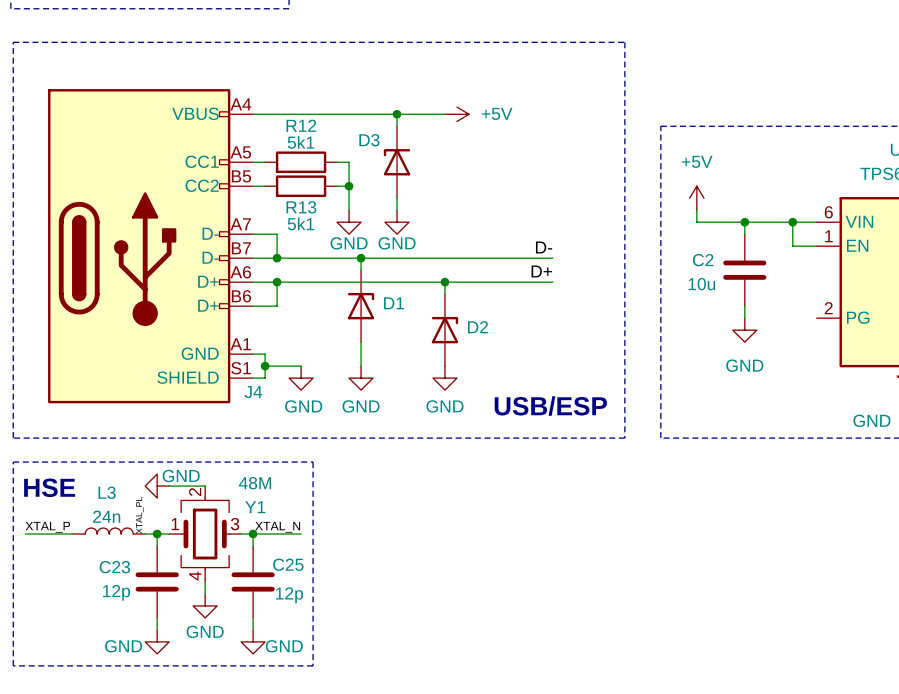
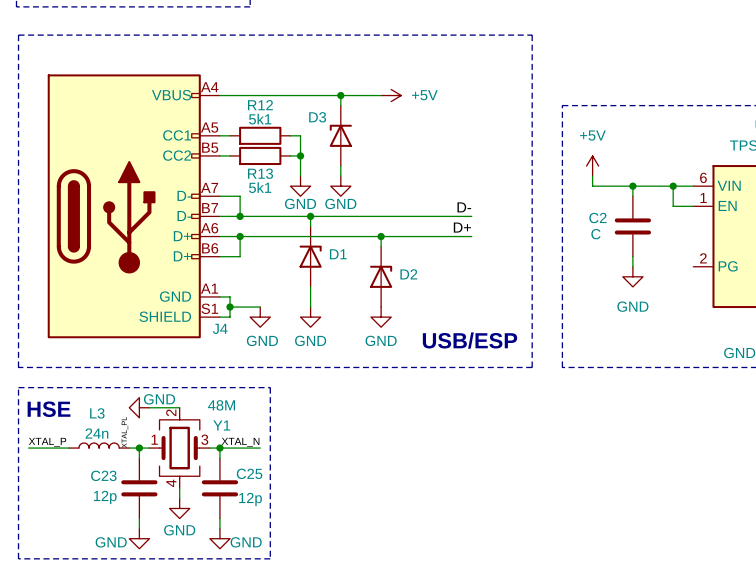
C2 value: 10u (701, 284) -> C (595, 234)

